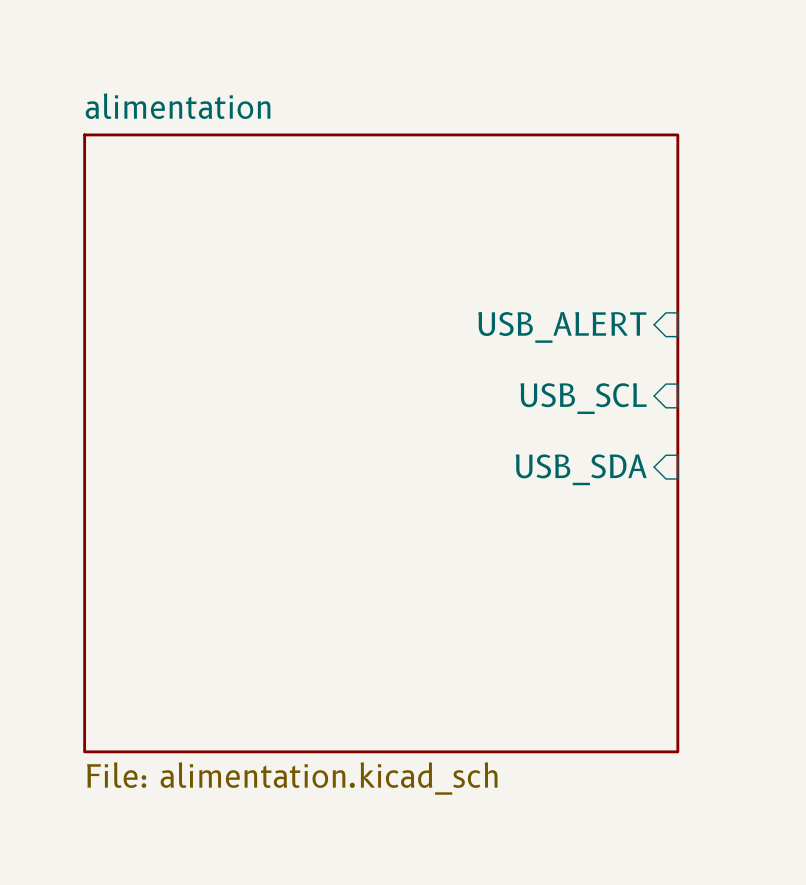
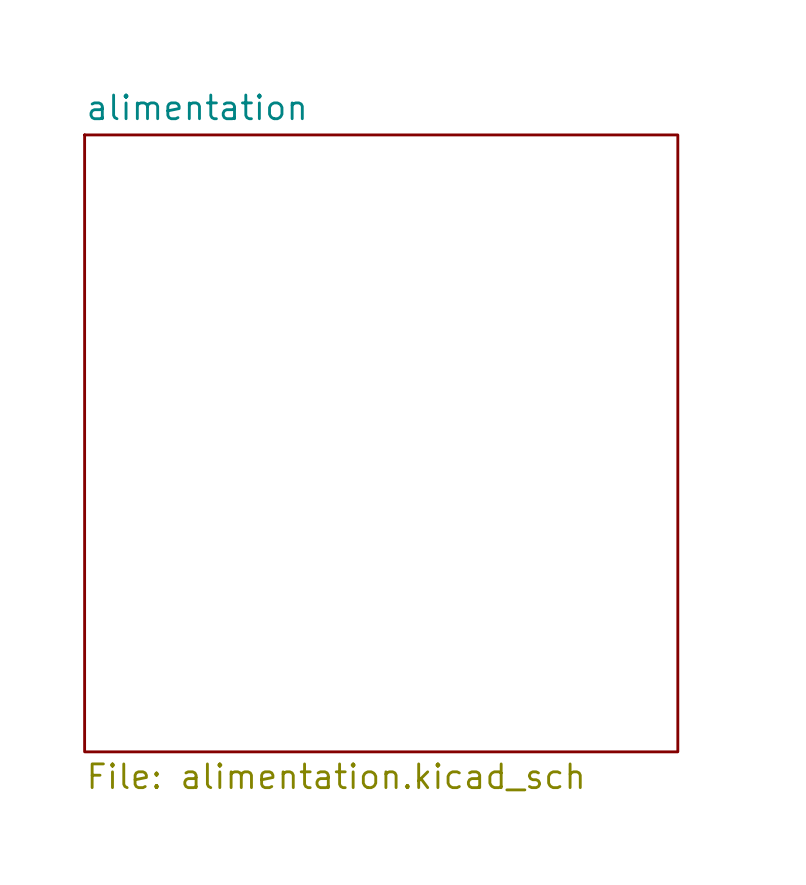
sheet pin: USB_ALERT (562, 327) -> none
sheet pin: USB_SCL (583, 398) -> none
sheet pin: USB_SDA (581, 469) -> none

